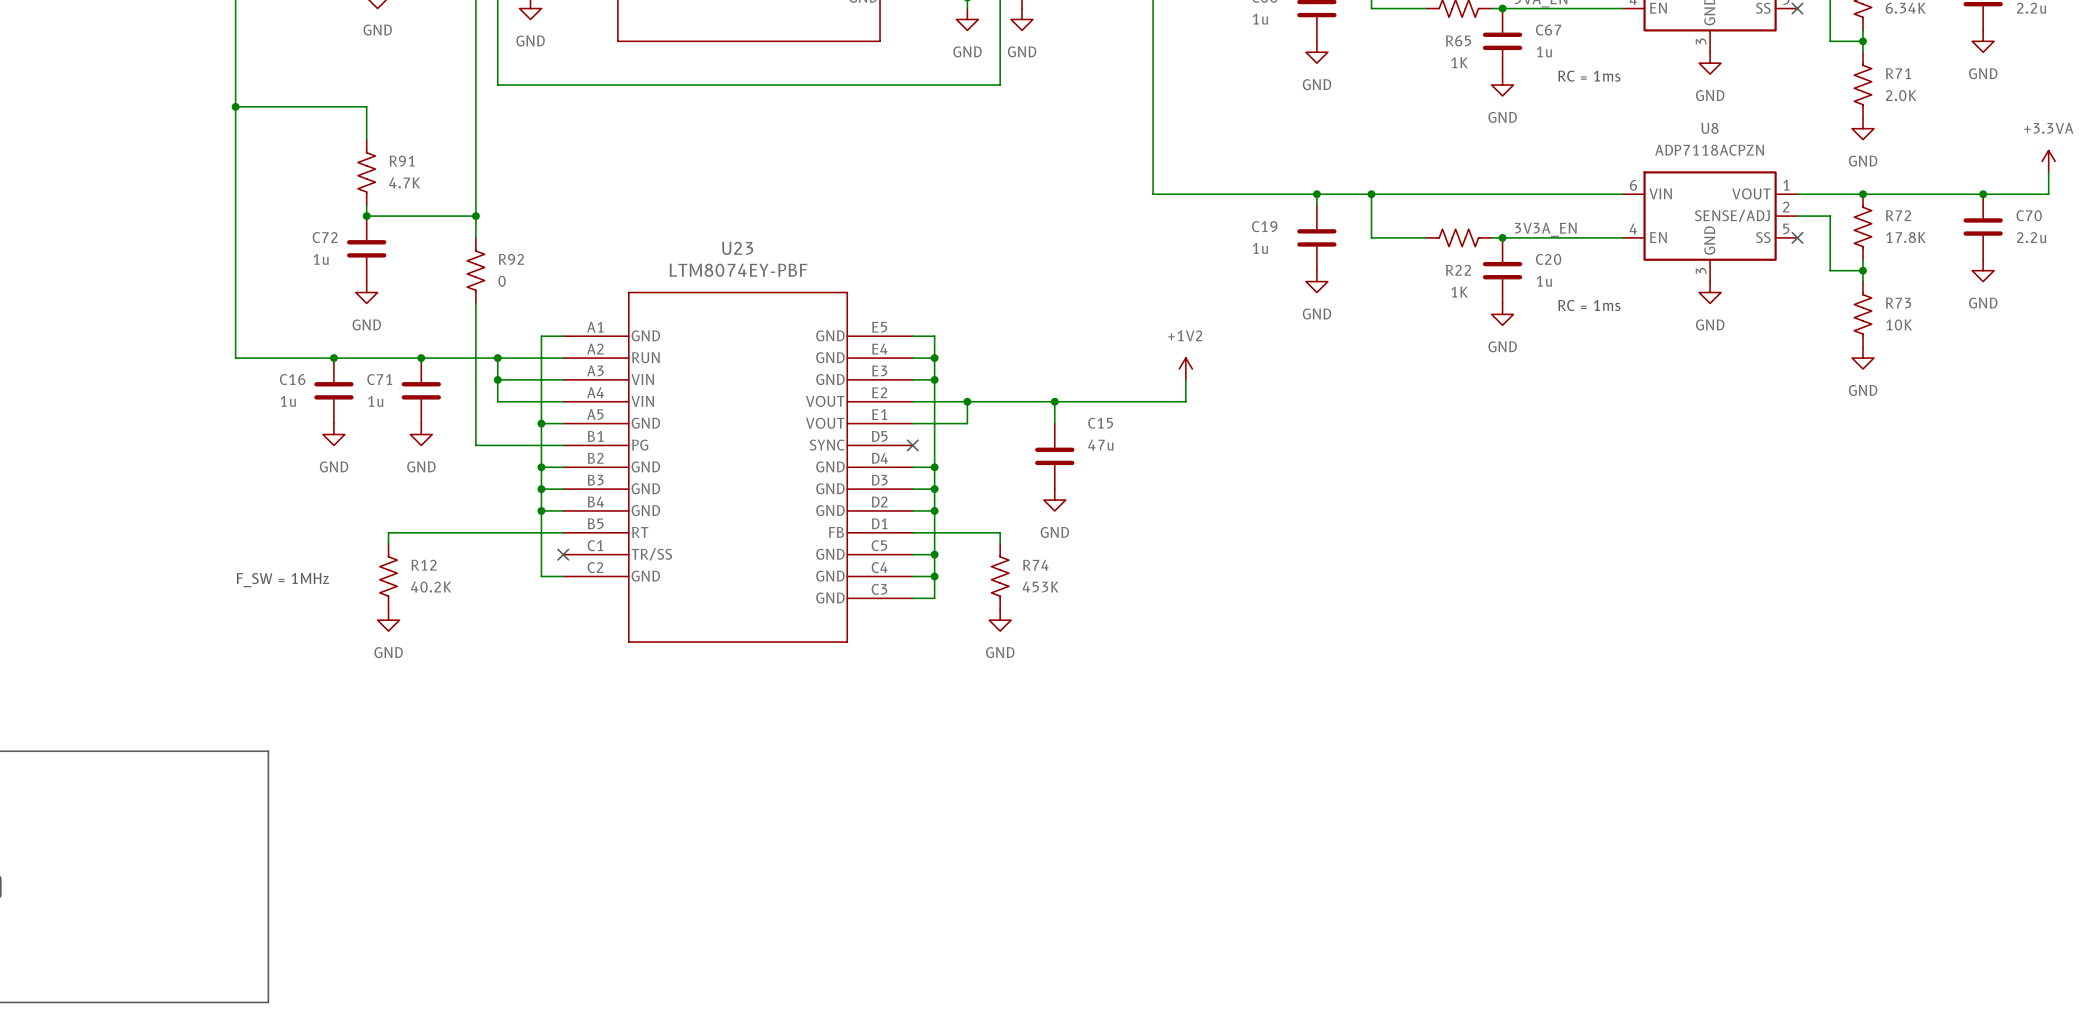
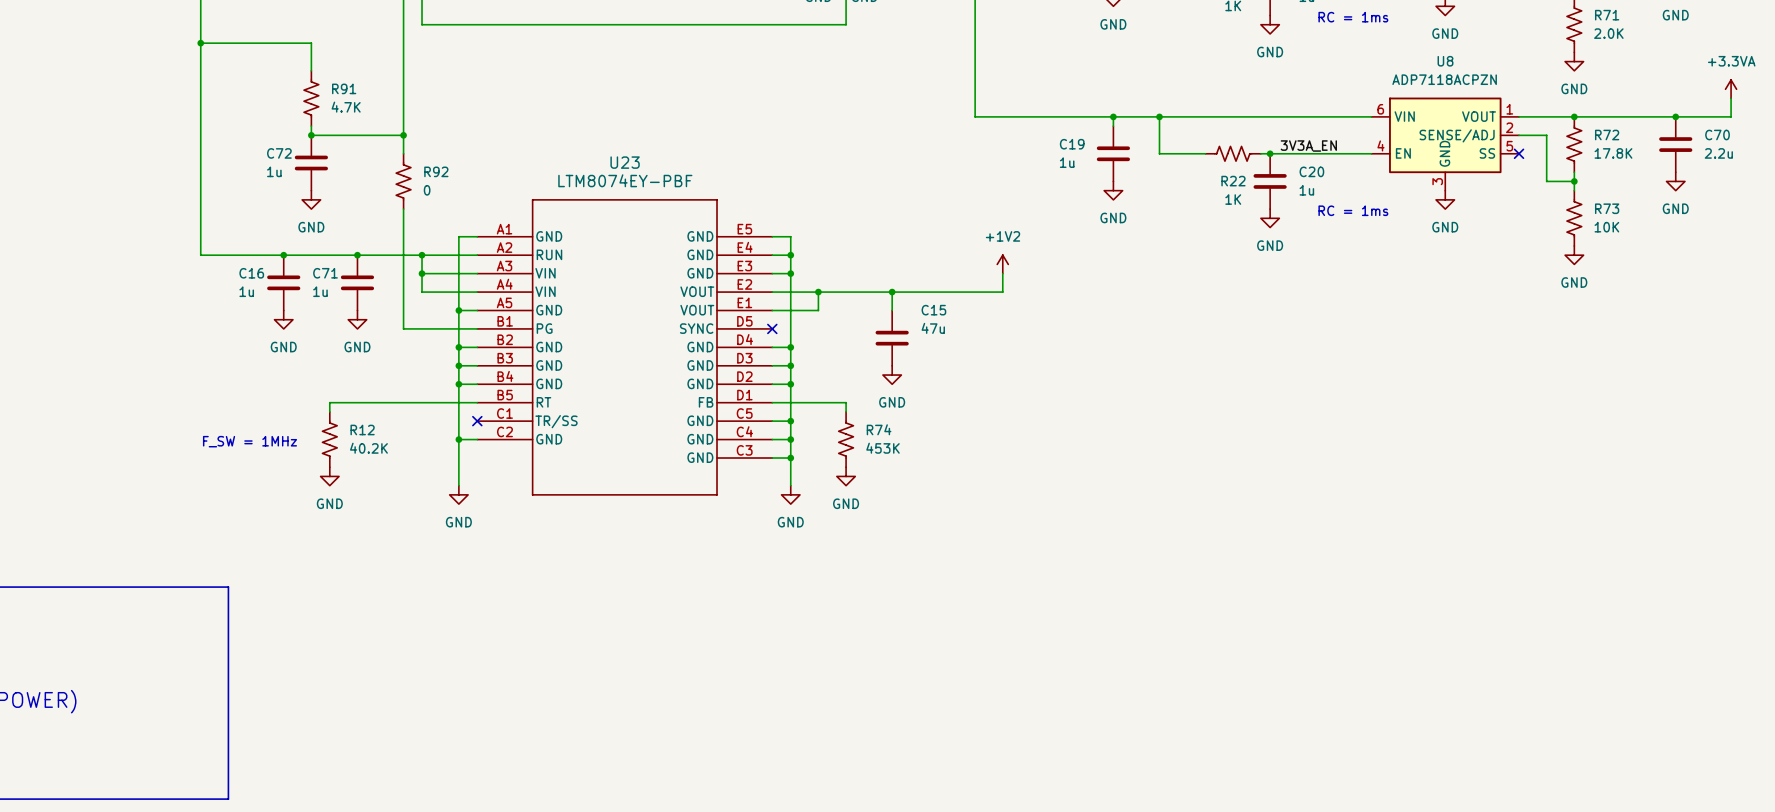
wire: none -> (458, 439) (458, 485)
junction: none -> (458, 439)
wire: none -> (790, 458) (790, 485)
junction: none -> (790, 458)
power symbol: none -> GND (458, 494)
power symbol: none -> GND (790, 494)

